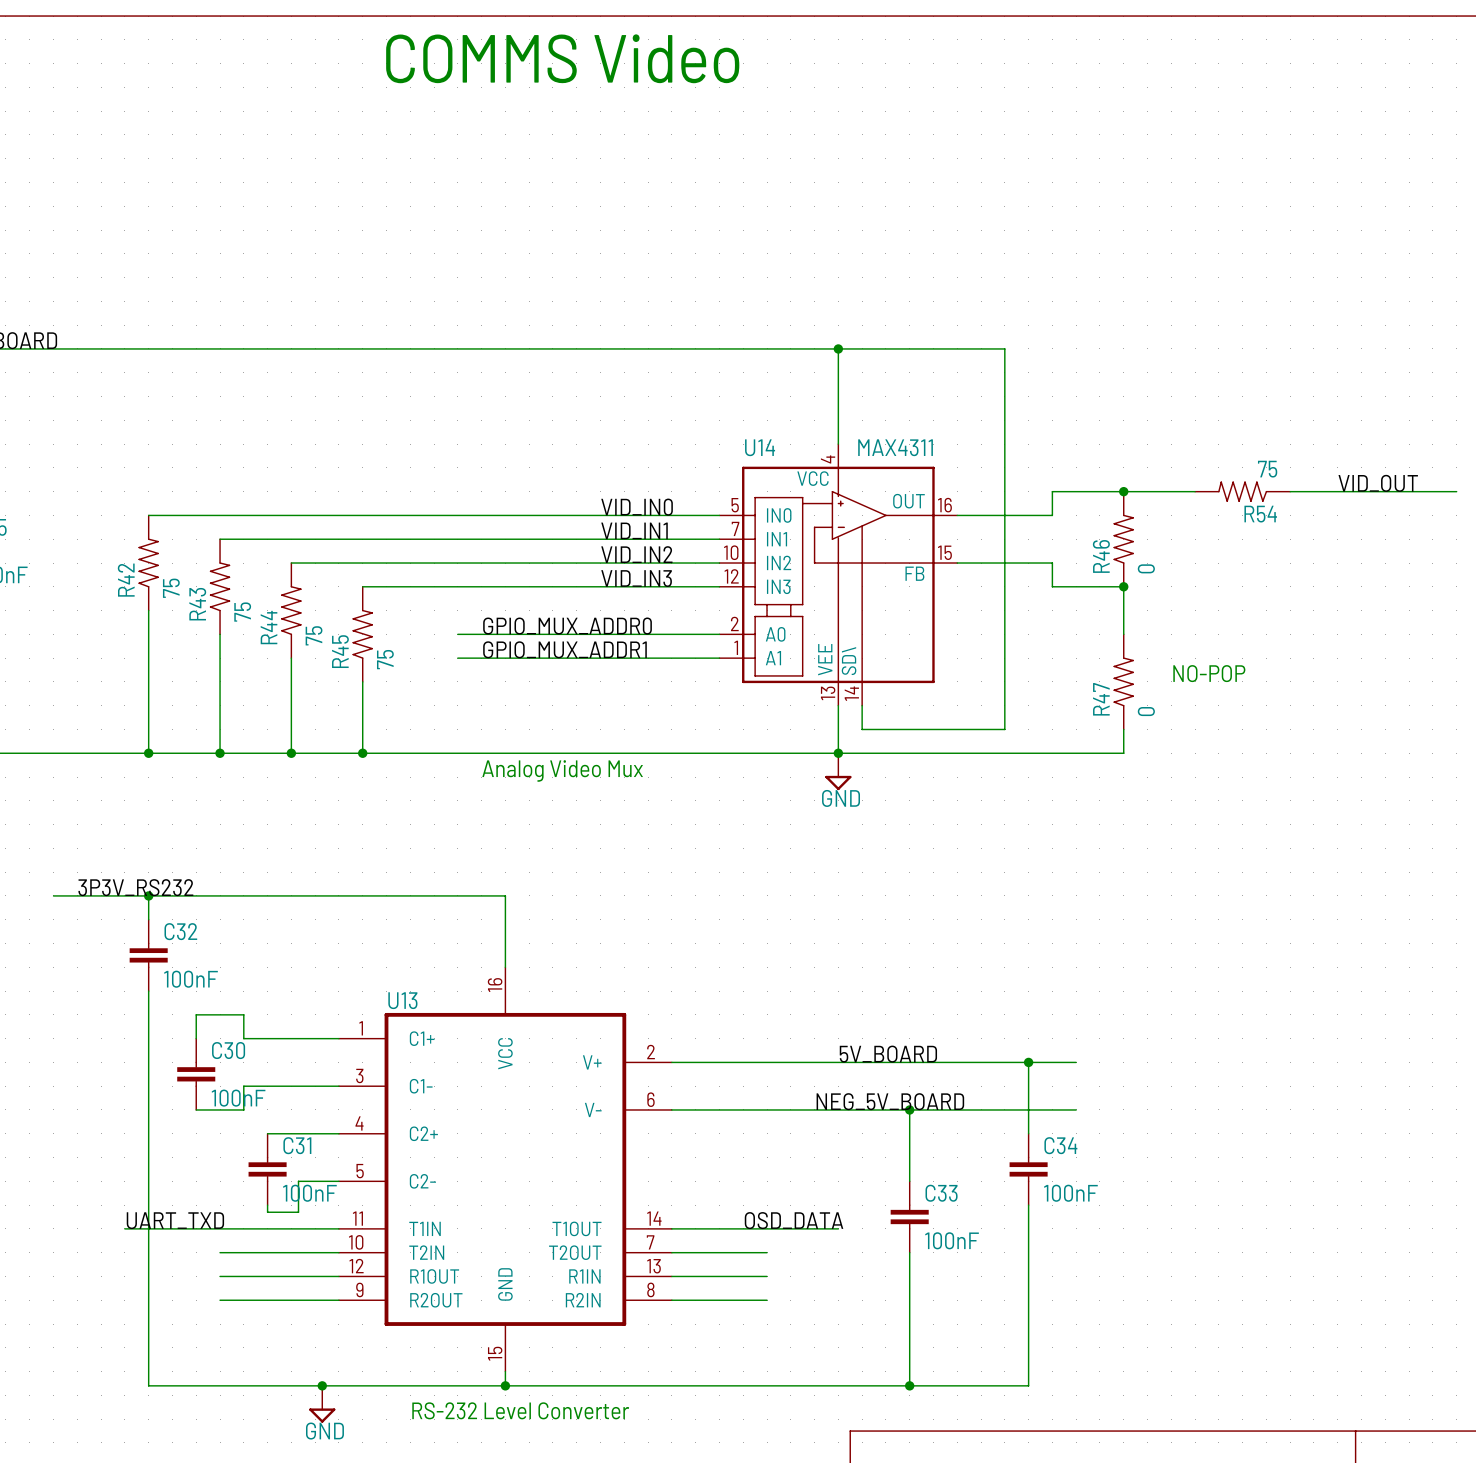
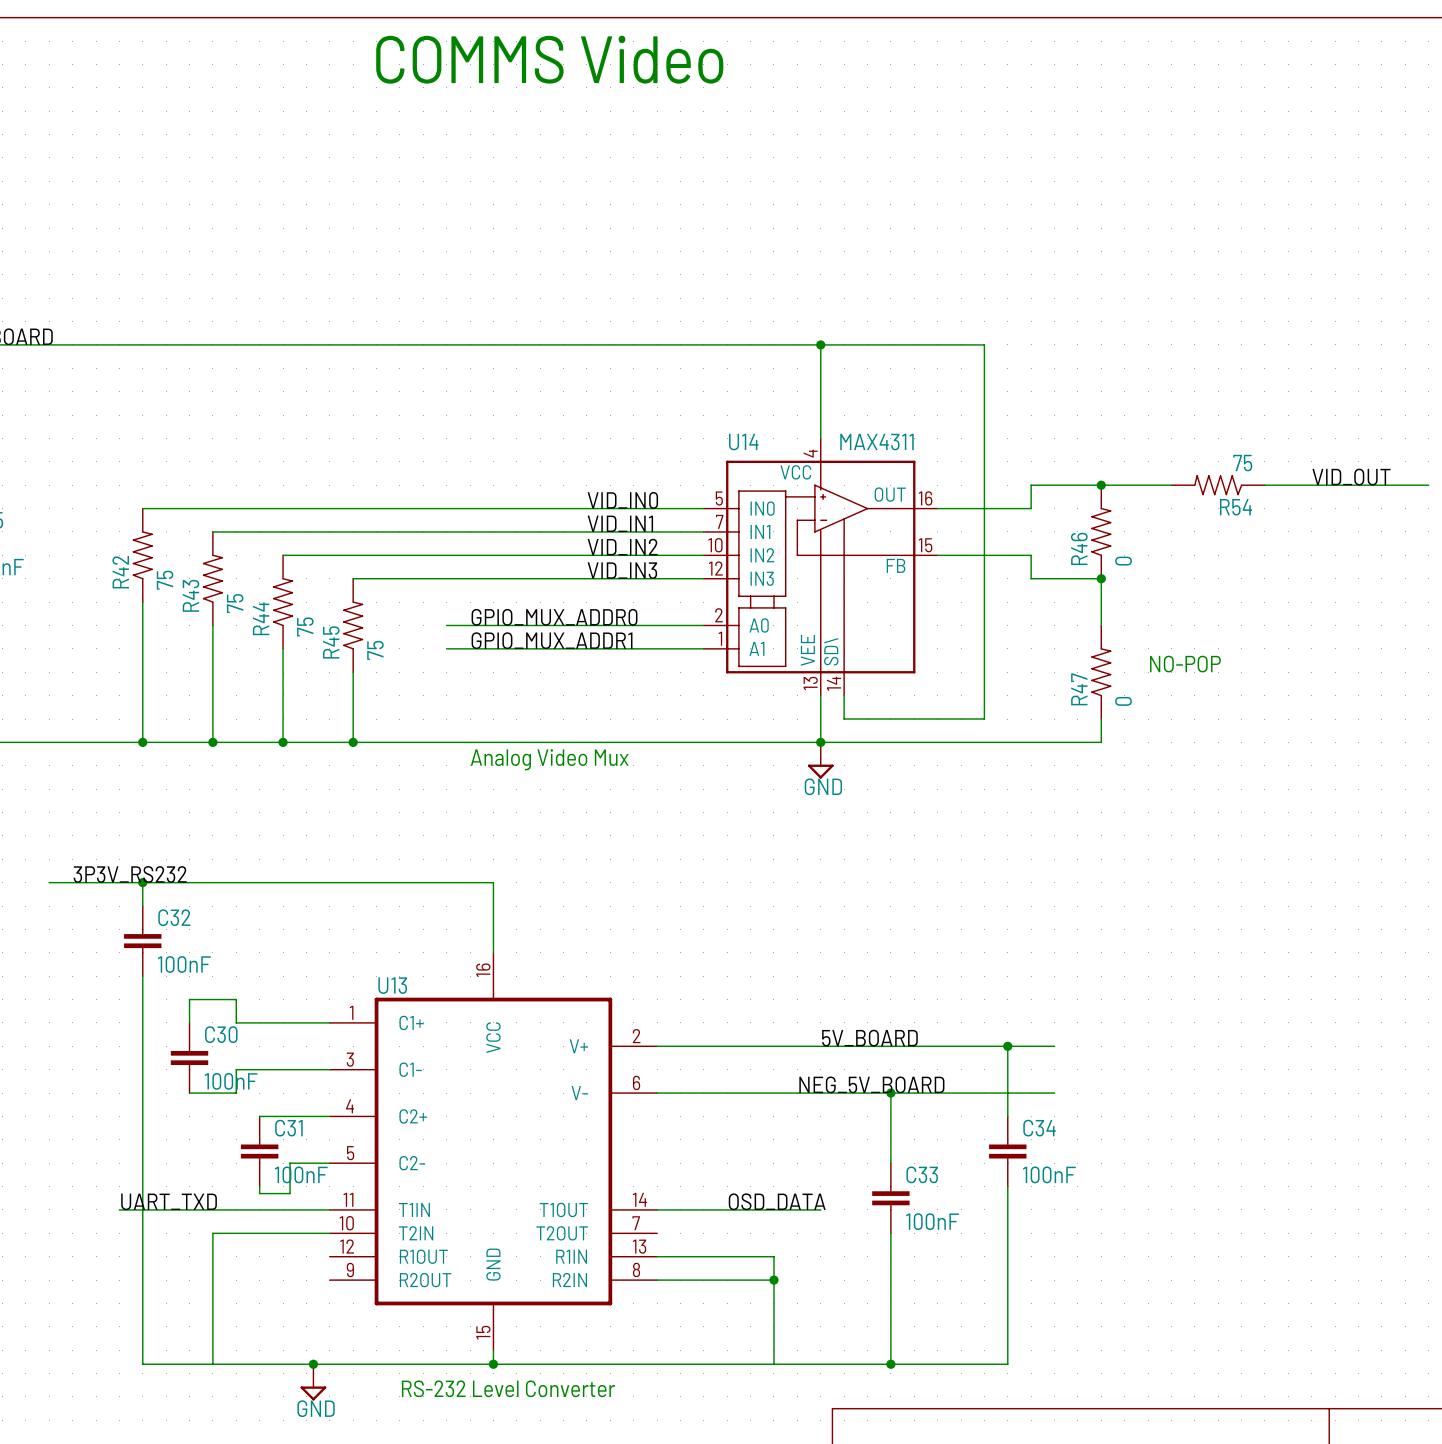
wire: none -> (212, 1233) (212, 1364)
wire: (671, 1252) (767, 1252) -> none
wire: (220, 1276) (338, 1276) -> none
wire: none -> (750, 1256) (773, 1256) (773, 1364)
wire: (220, 1300) (338, 1300) -> none
wire: none -> (750, 1280) (773, 1280)
junction: none -> (773, 1280)

